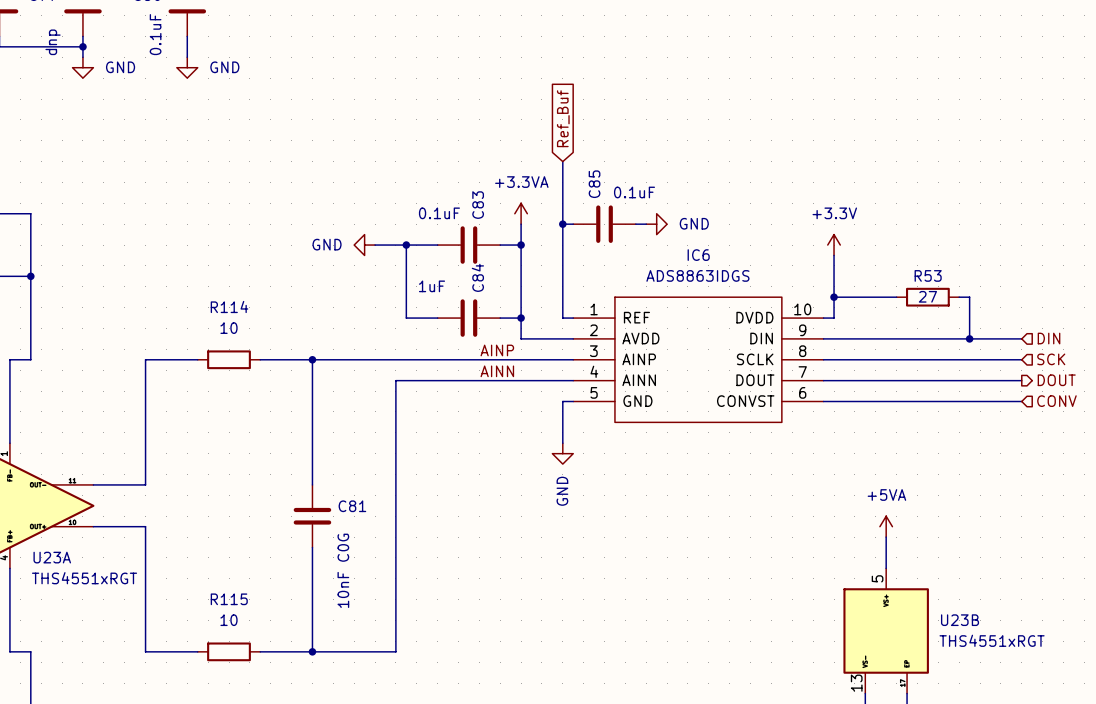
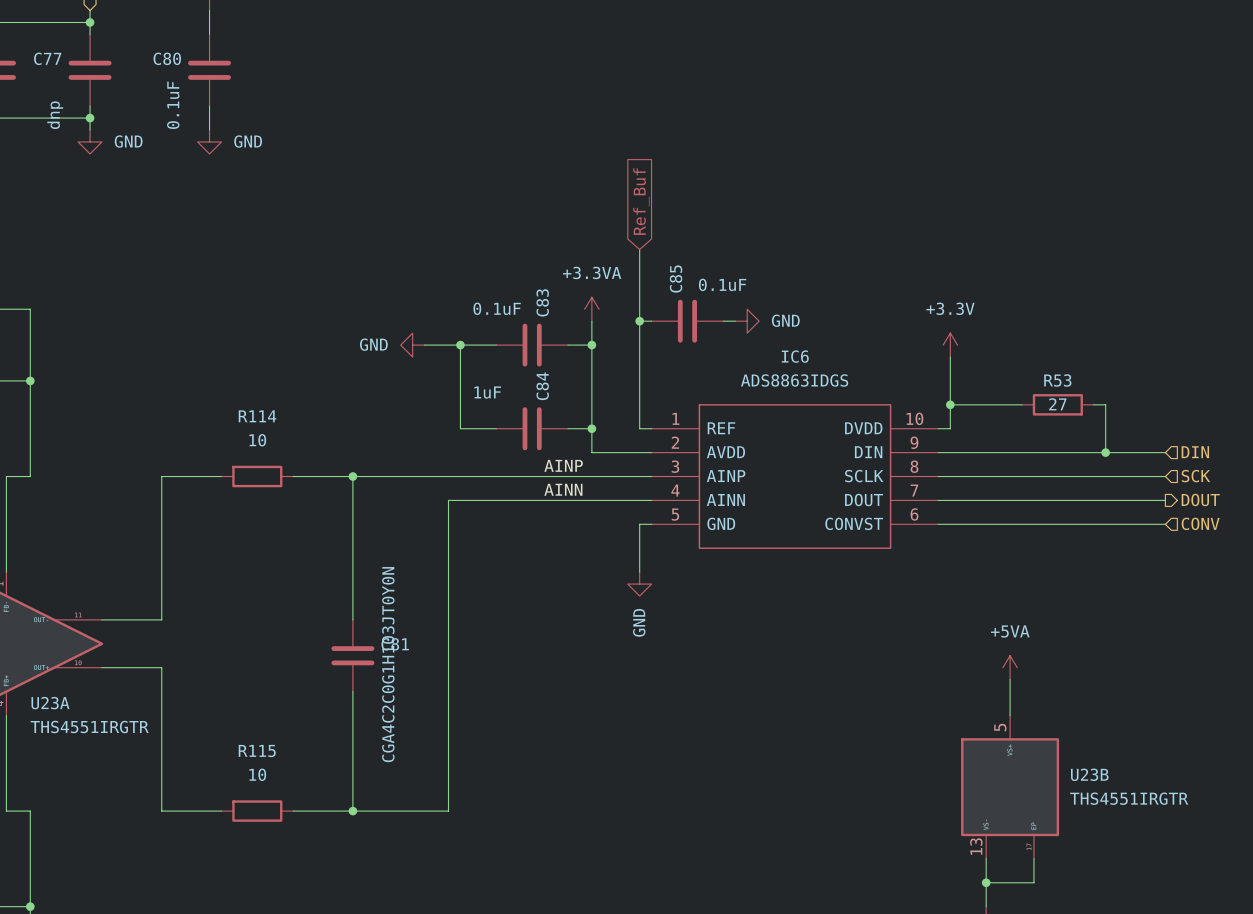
C81 value: 10nF C0G (343, 570) -> CGA4C2C0G1H103JT0Y0N (388, 664)
U23A value: THS4551xRGT (84, 578) -> THS4551IRGTR (89, 727)
U23B value: THS4551xRGT (992, 640) -> THS4551IRGTR (1129, 798)

